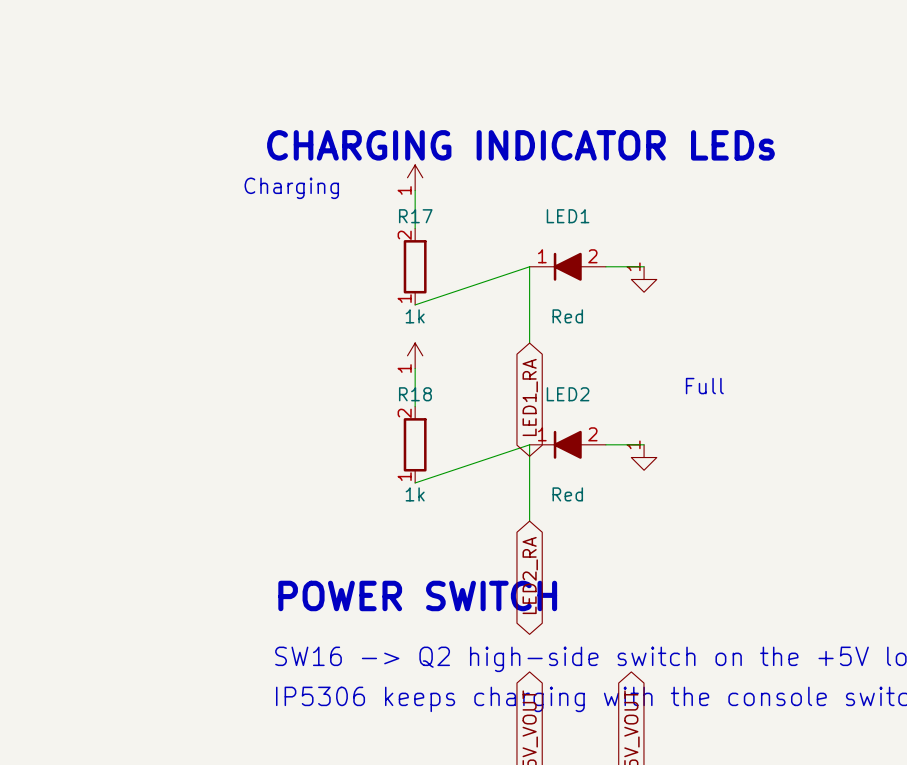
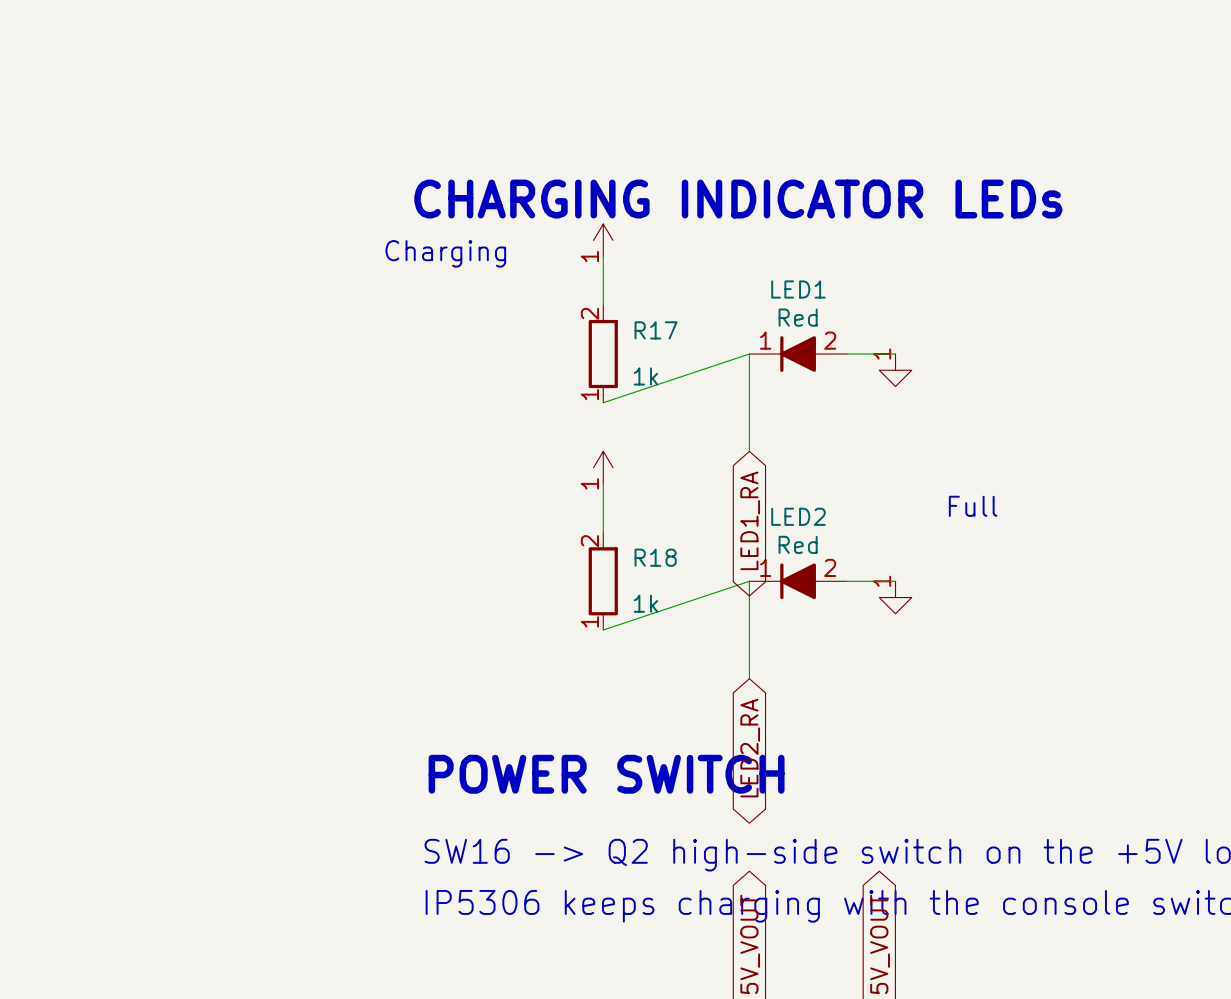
R17 name position: R17 (415, 216) -> R17 (656, 330)
R17 value position: 1k (415, 316) -> 1k (645, 376)
LED1 value position: Red (567, 316) -> Red (798, 317)
R18 name position: R18 (415, 394) -> R18 (655, 557)
R18 value position: 1k (415, 494) -> 1k (645, 603)
LED2 value position: Red (567, 494) -> Red (798, 544)

